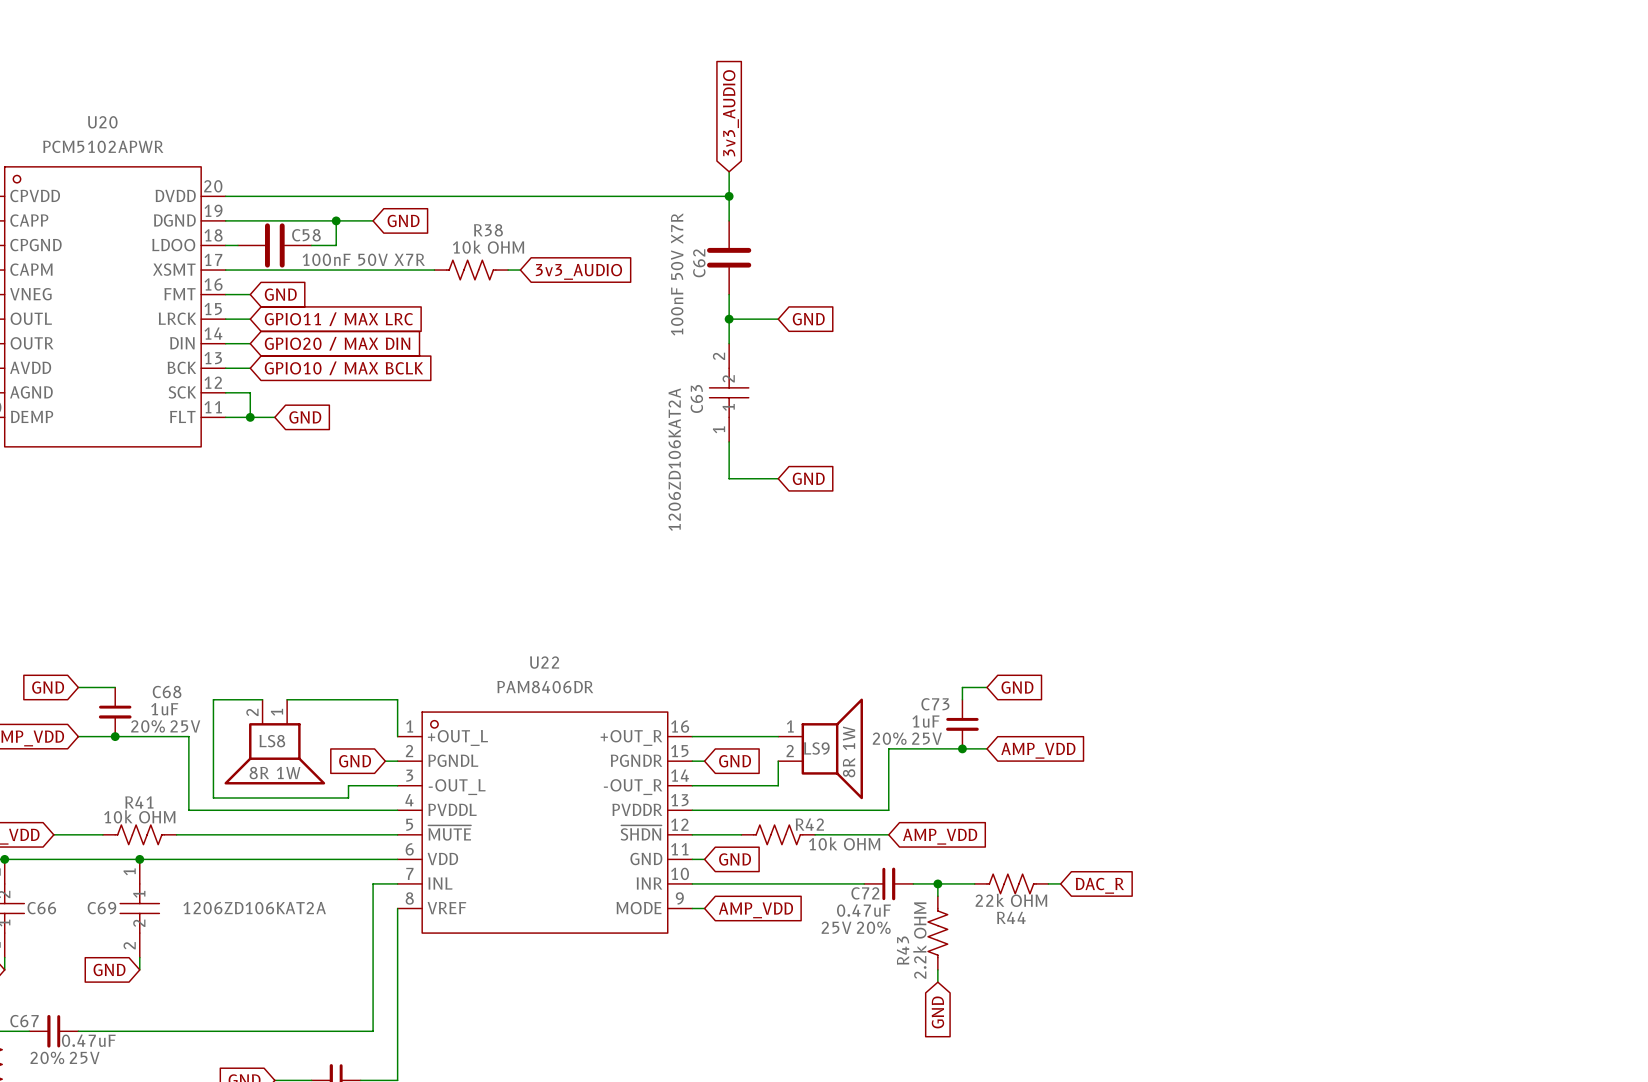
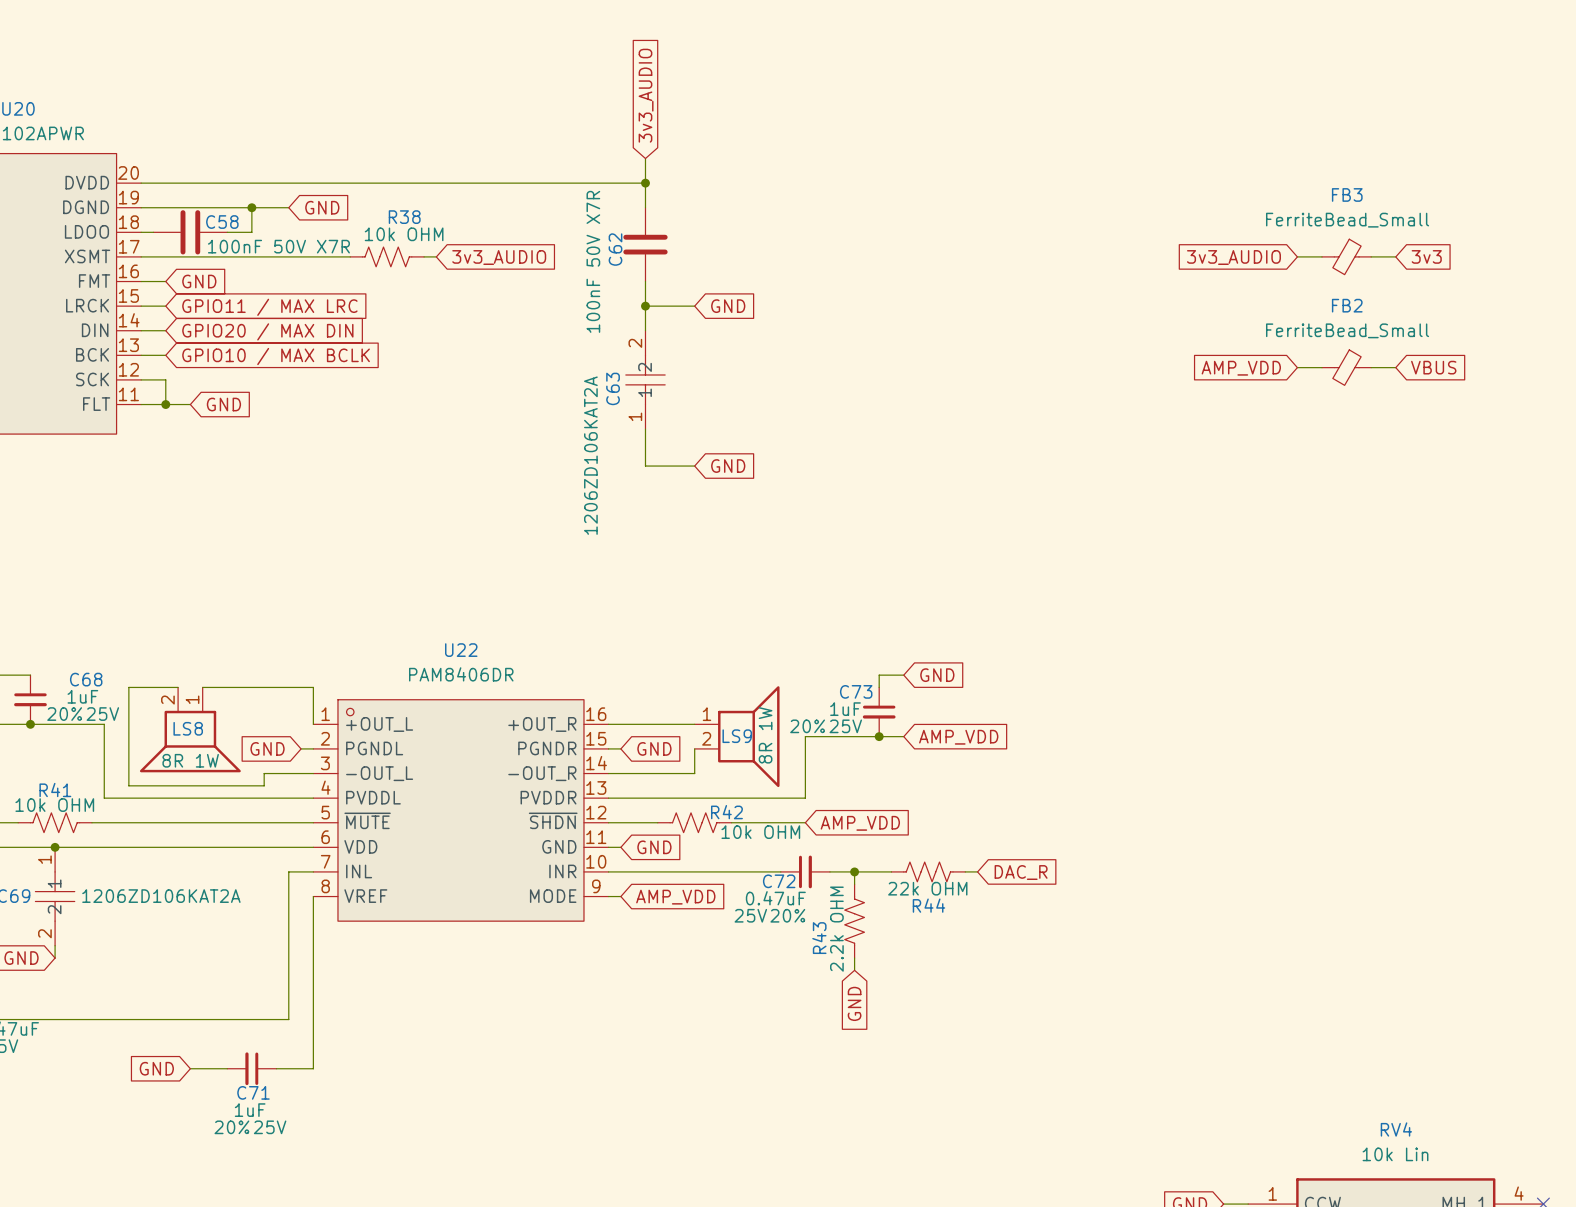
wire: none -> (1297, 256) (1322, 256)
FB3: none -> FerriteBead_Small (1346, 256)
wire: none -> (1371, 256) (1395, 256)
global label: none -> 3v3 (1426, 256)
global label: none -> 3v3_AUDIO (1233, 257)
wire: none -> (1297, 367) (1322, 367)
FB2: none -> FerriteBead_Small (1346, 367)
wire: none -> (1371, 367) (1395, 367)
global label: none -> VBUS (1433, 367)
global label: none -> AMP_VDD (1241, 368)

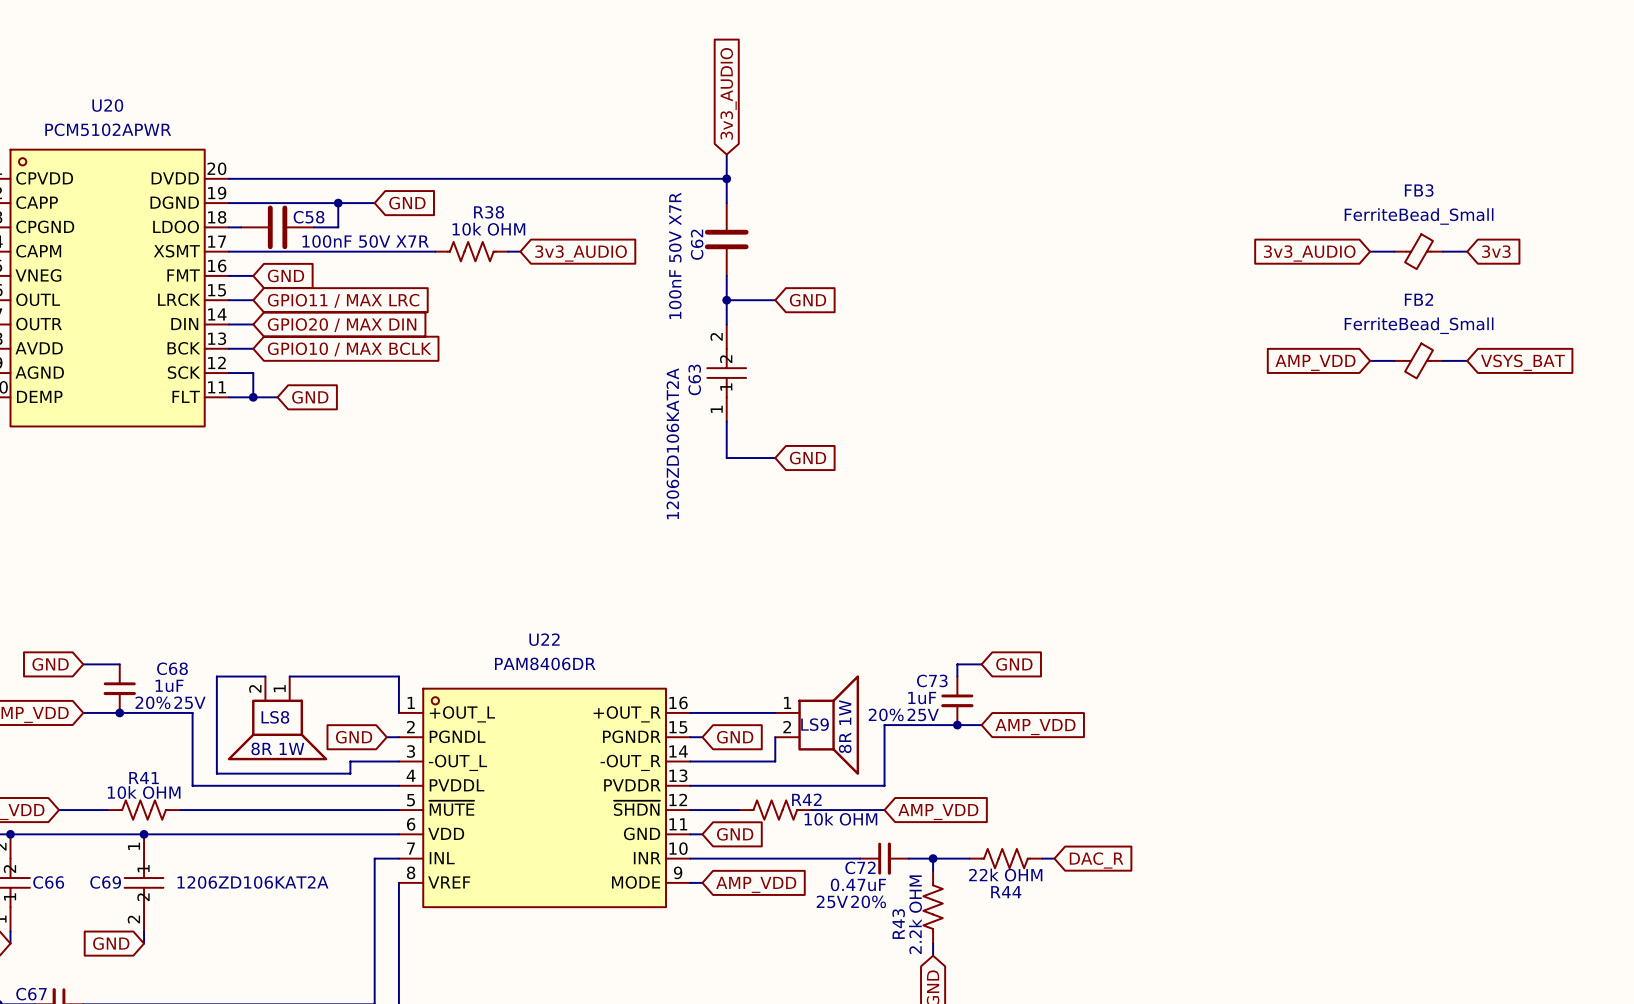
global label: VBUS (1433, 367) -> VSYS_BAT (1522, 362)

